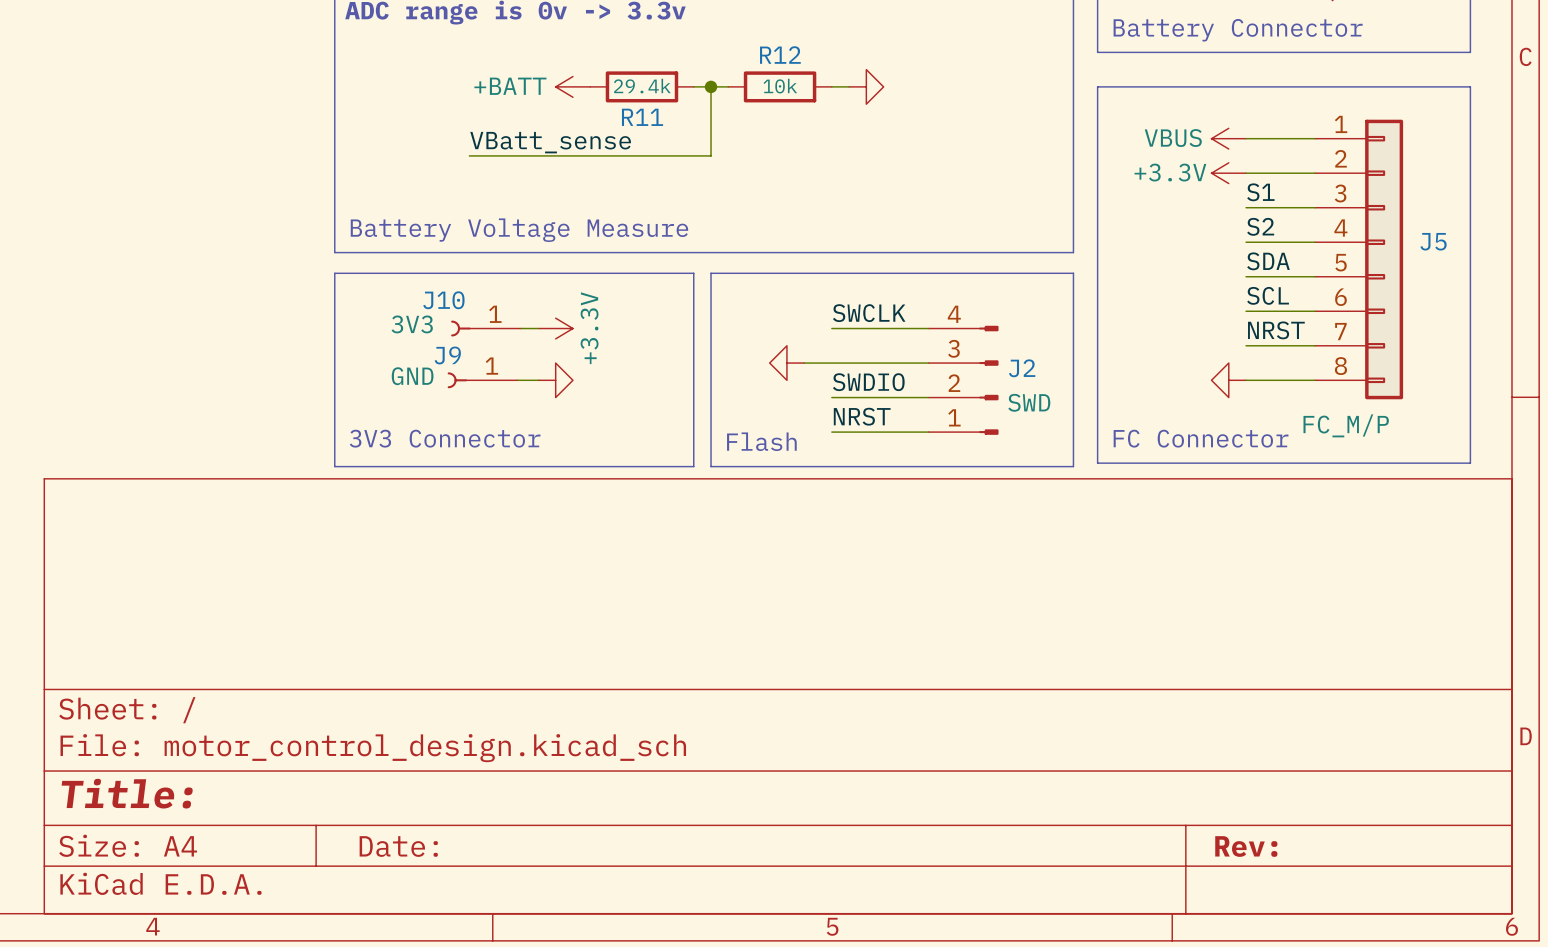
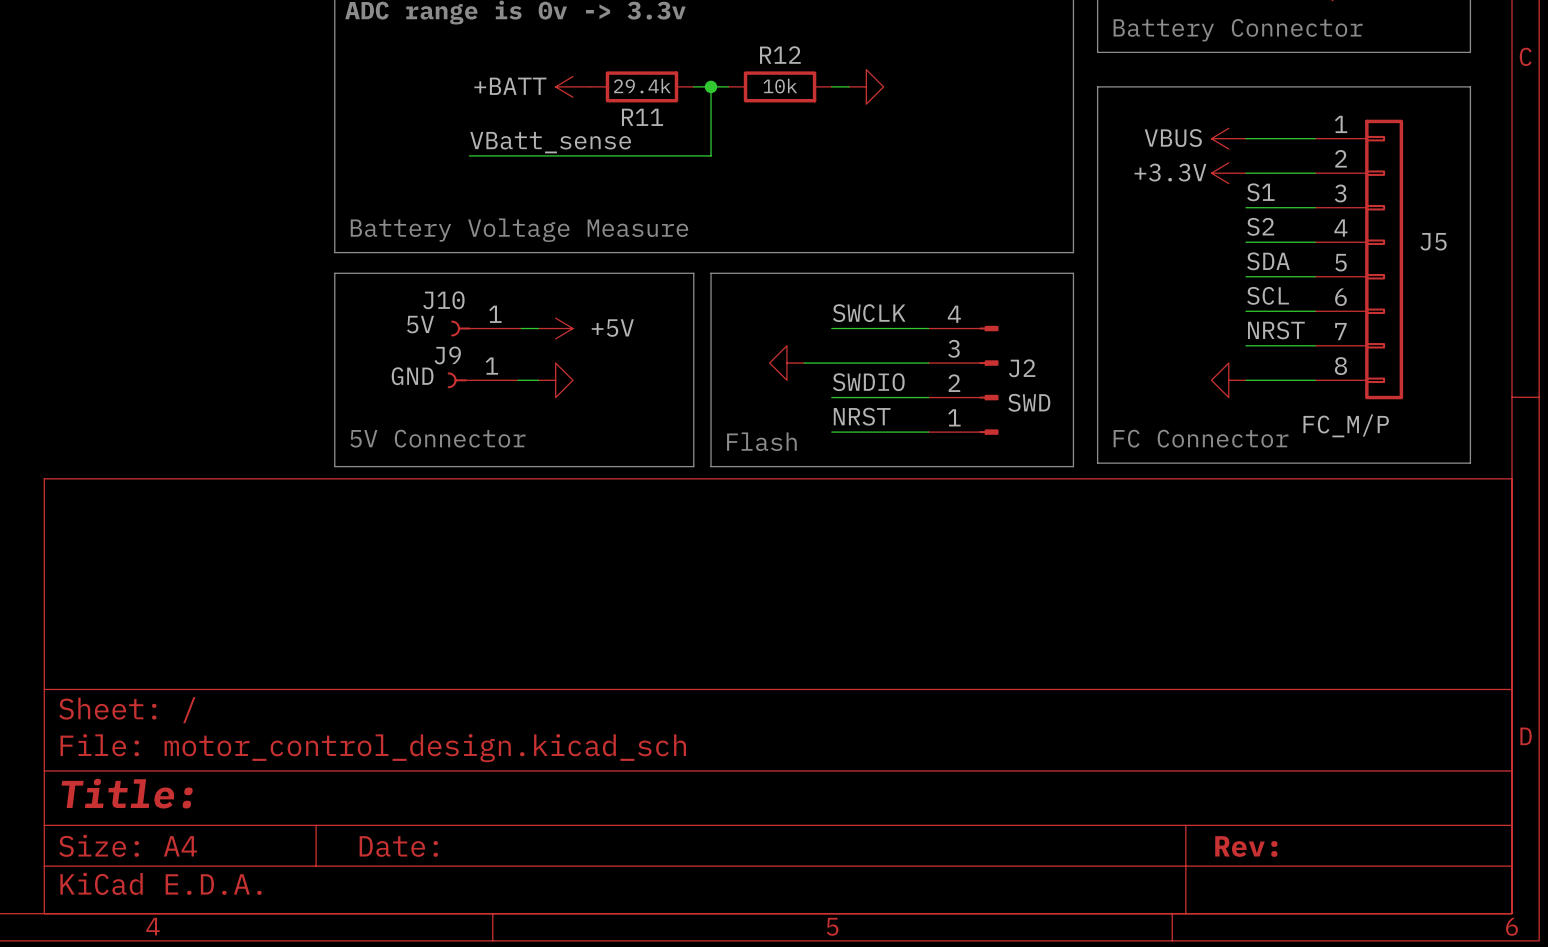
J10 value: 3V3 (412, 324) -> 5V (420, 324)
power symbol: +3.3V (555, 328) -> +5V (555, 328)
text: 3V3 Connector (445, 438) -> 5V Connector (437, 438)

